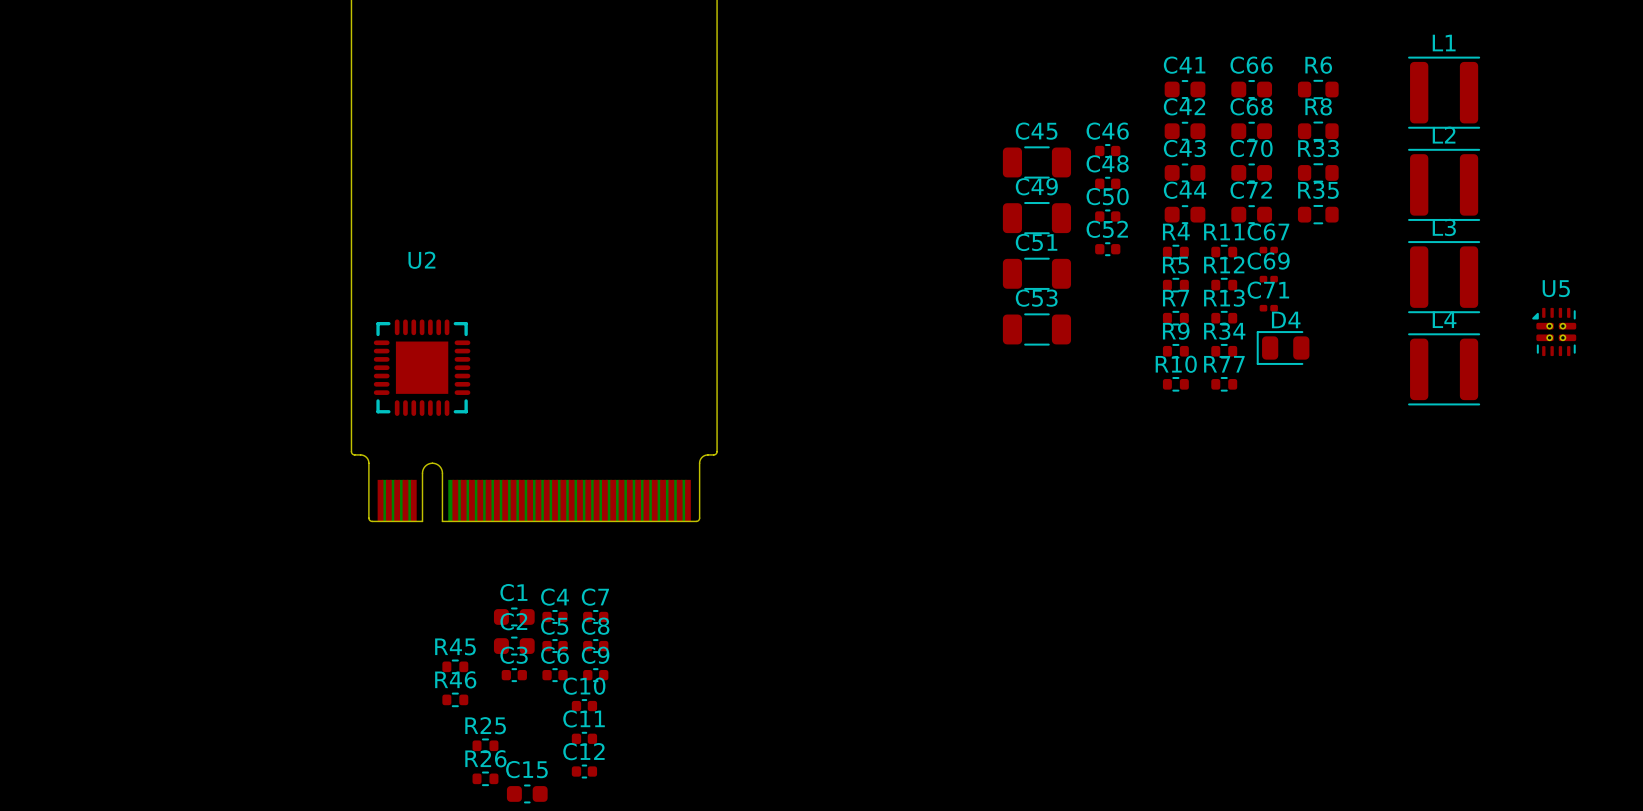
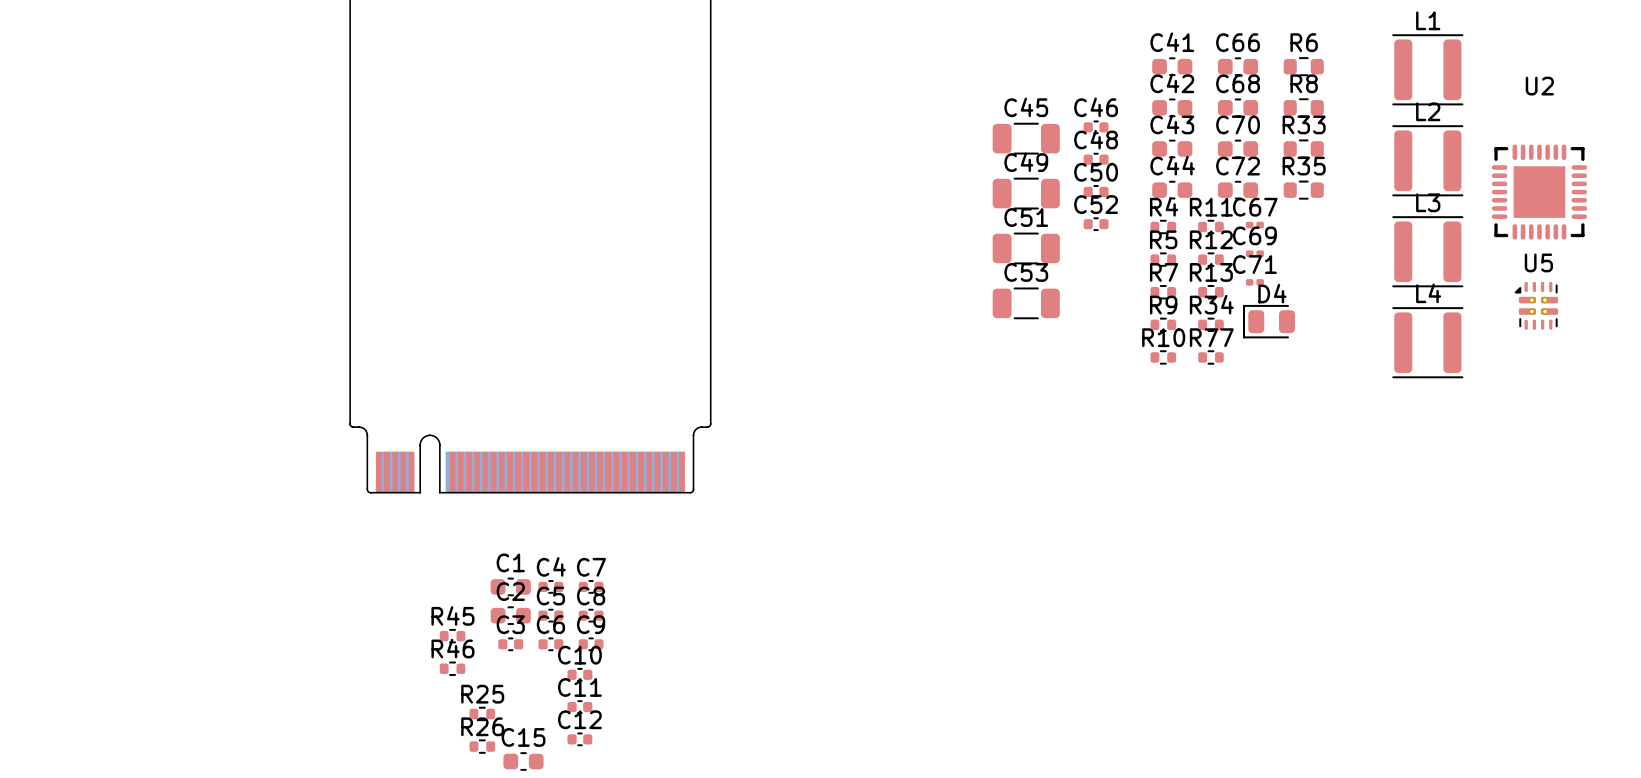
U2 position: (420, 367) -> (1537, 192)

